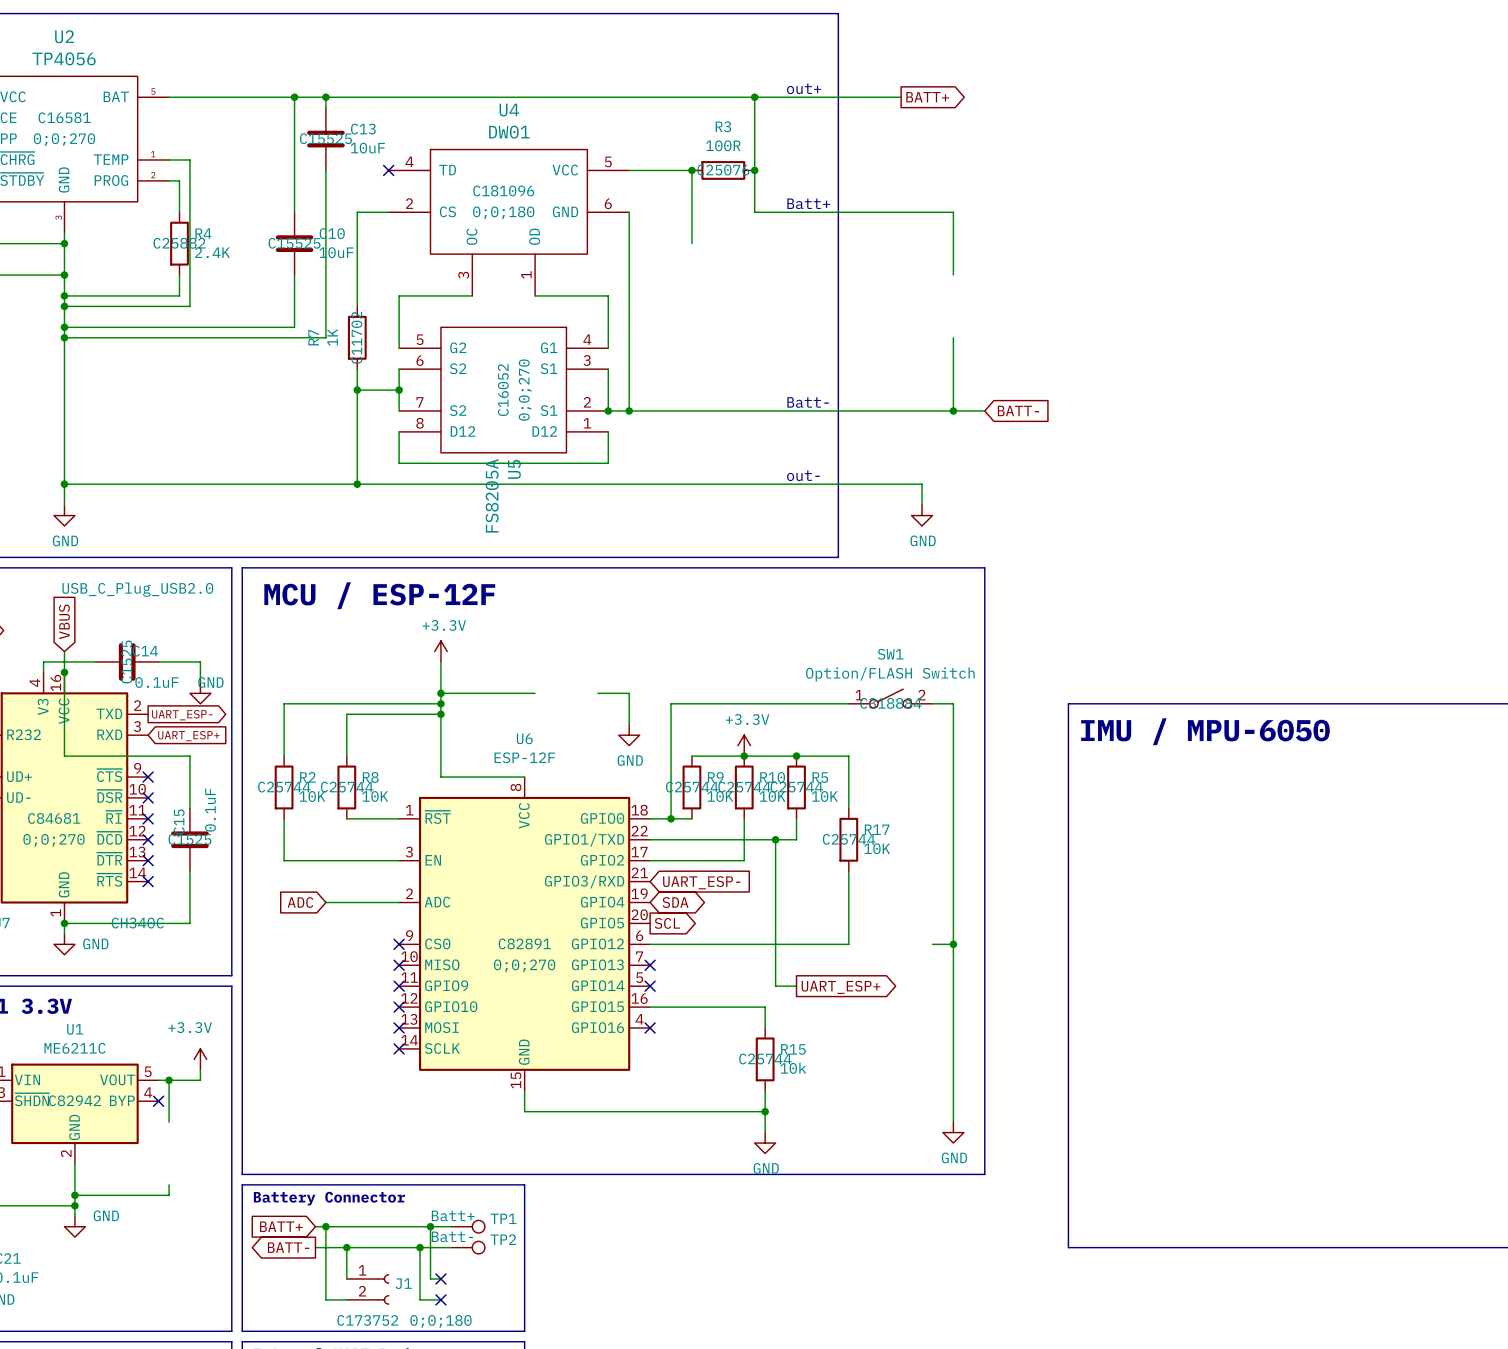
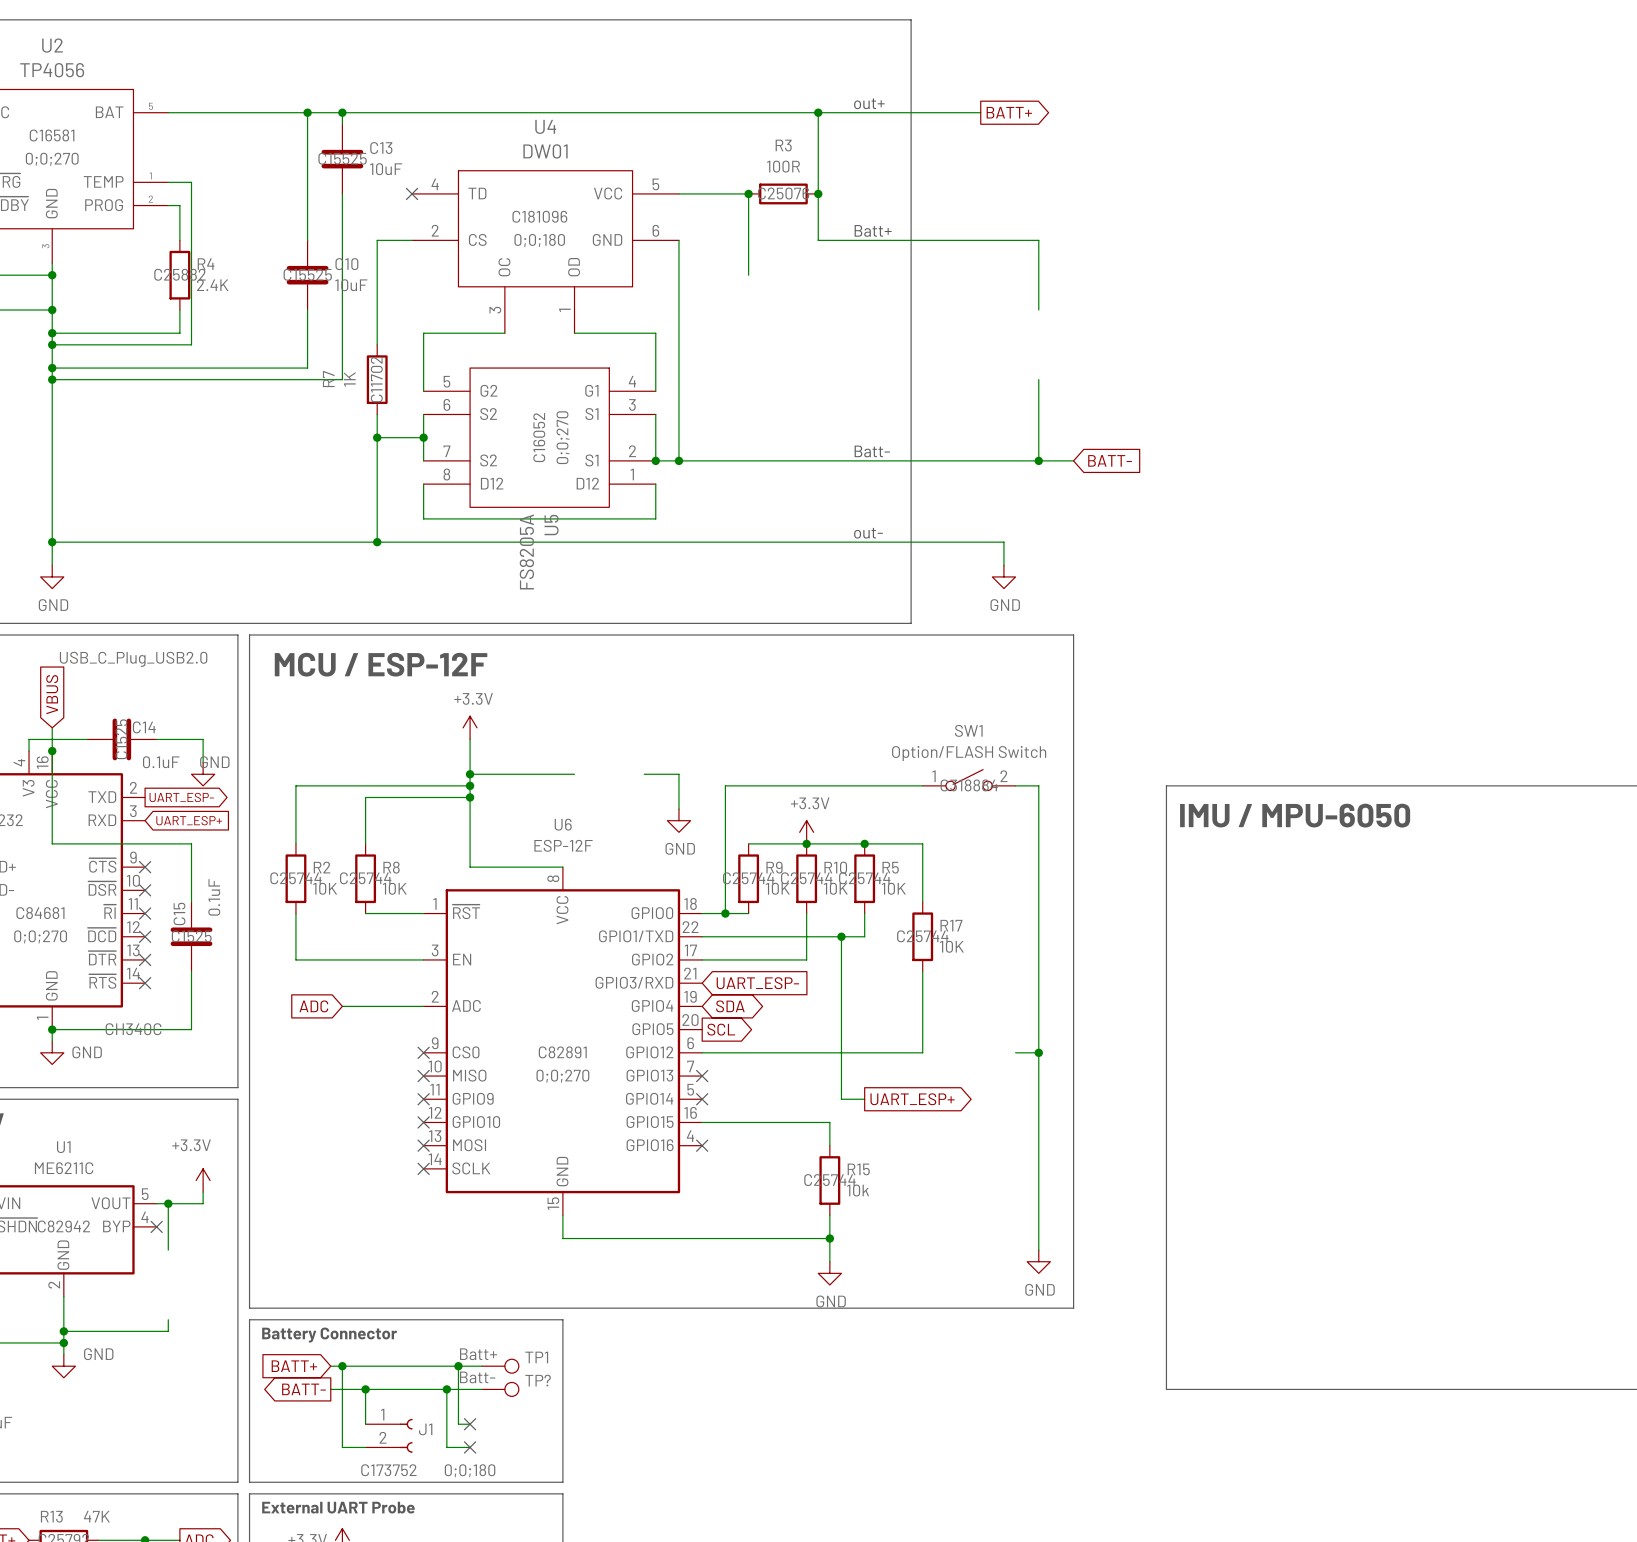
TP2 name: TP2 (503, 1239) -> TP? (538, 1380)

